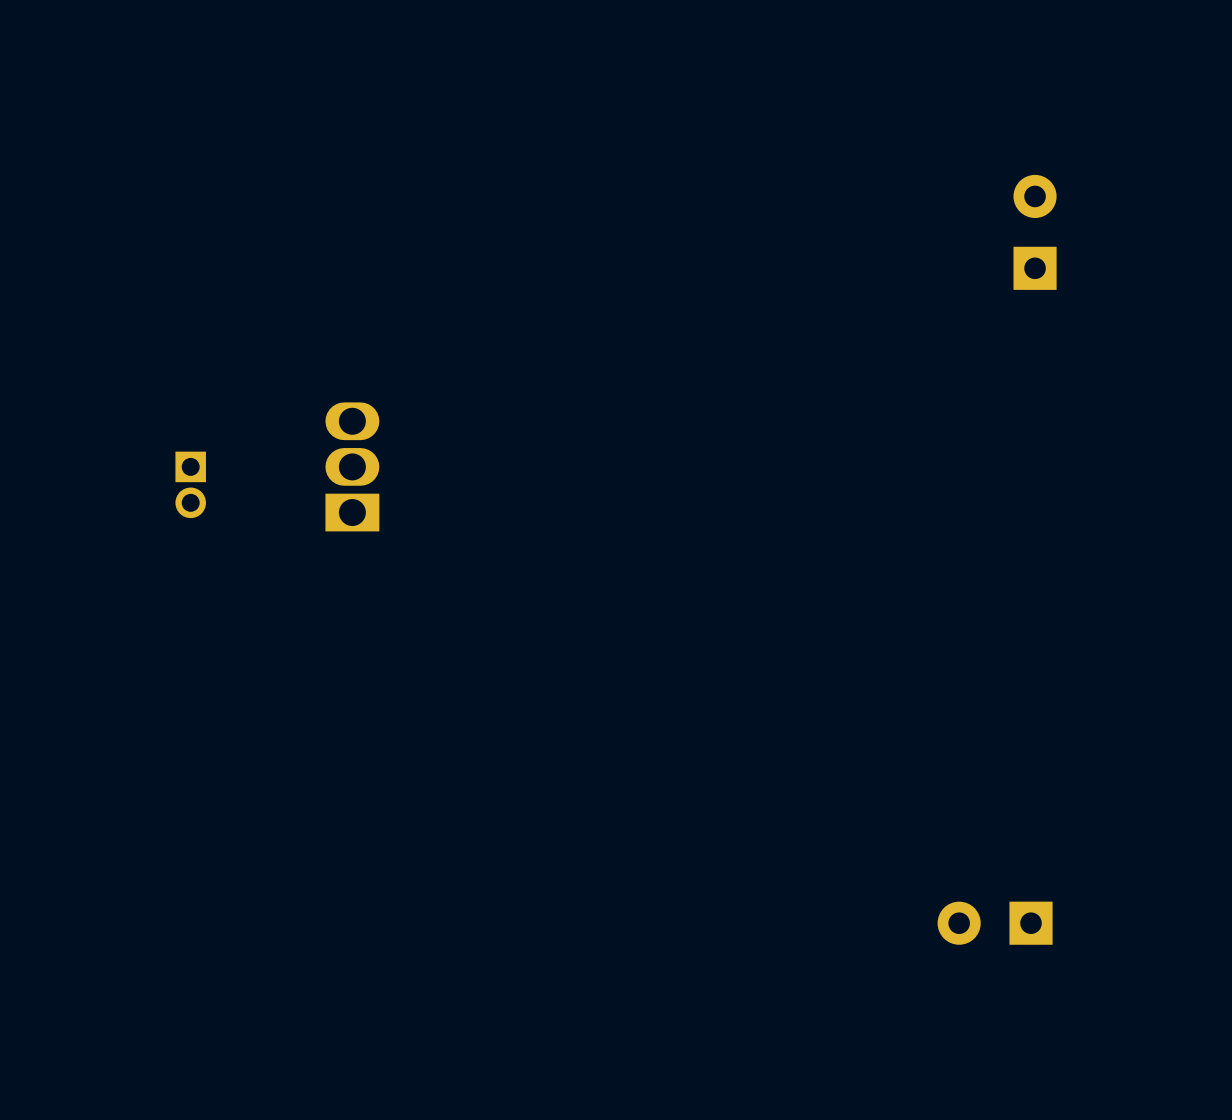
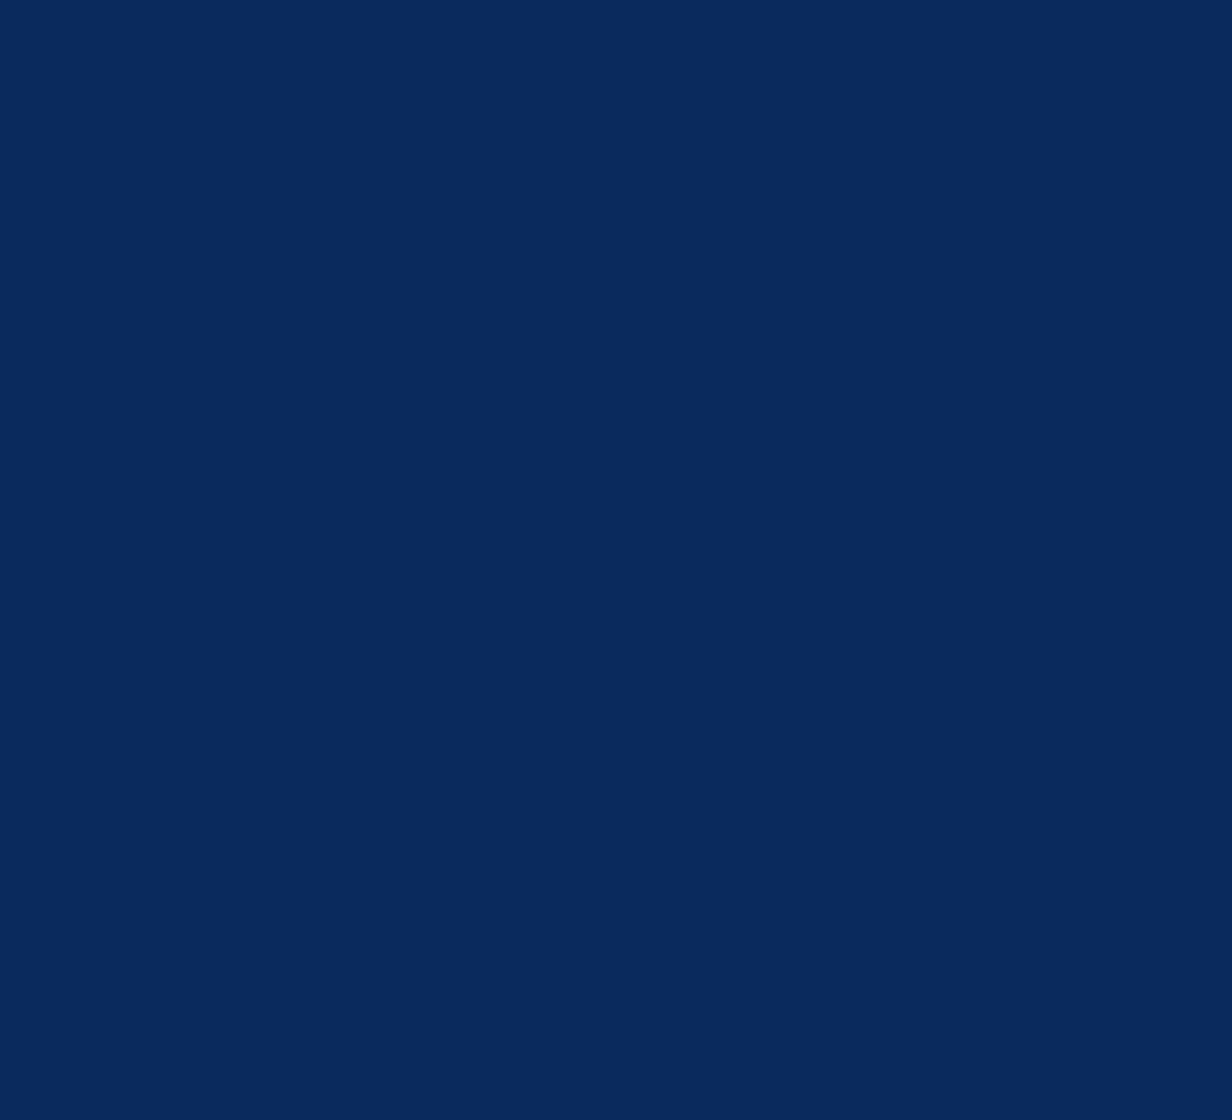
part: (1035, 232) -> none
part: (352, 466) -> none
part: (190, 484) -> none
part: (995, 923) -> none

